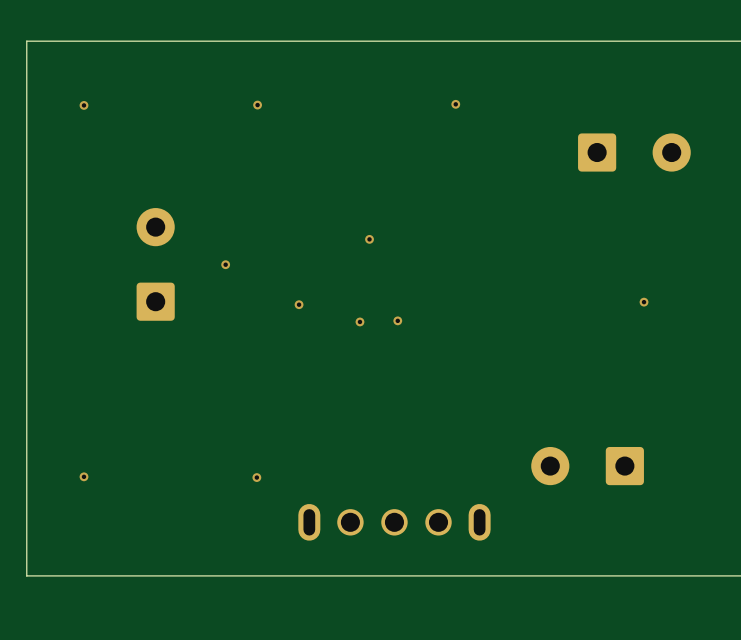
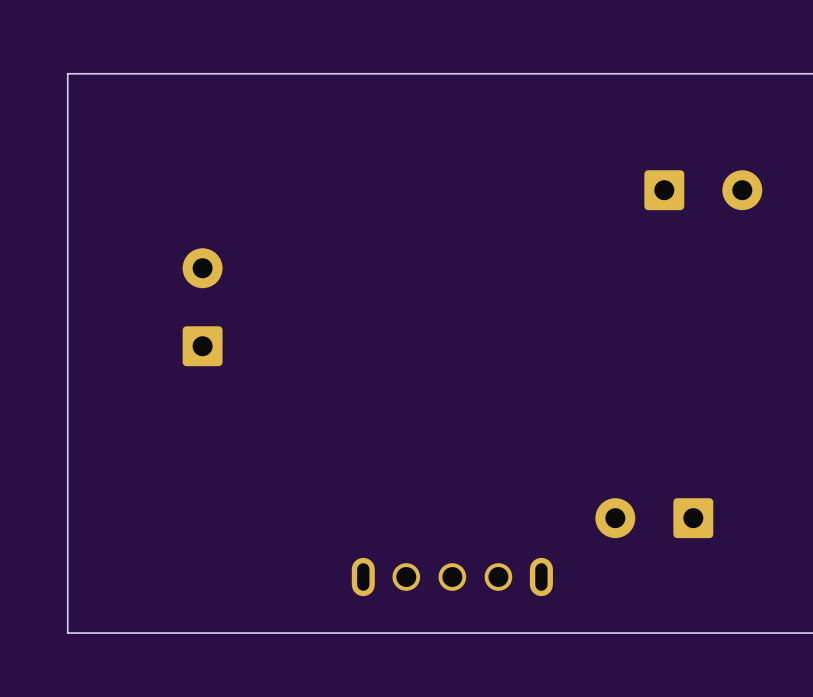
via: (455, 104) -> none
via: (83, 105) -> none
via: (257, 105) -> none
via: (369, 239) -> none
via: (225, 264) -> none
via: (644, 302) -> none
via: (299, 304) -> none
via: (397, 320) -> none
via: (359, 321) -> none
via: (83, 476) -> none
via: (256, 477) -> none

